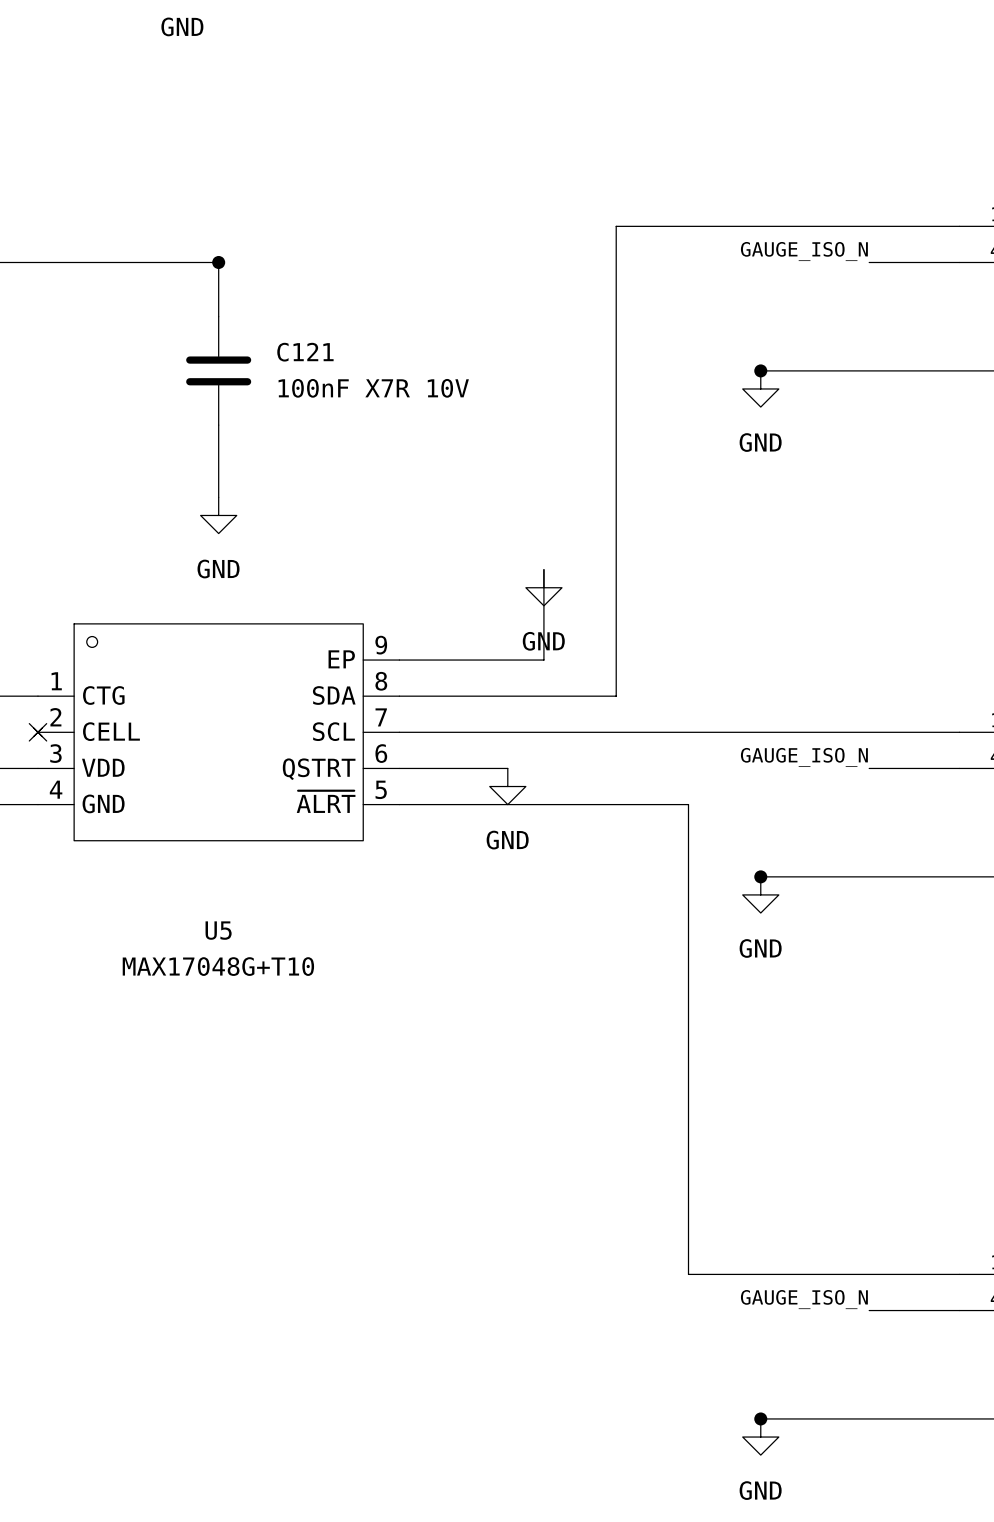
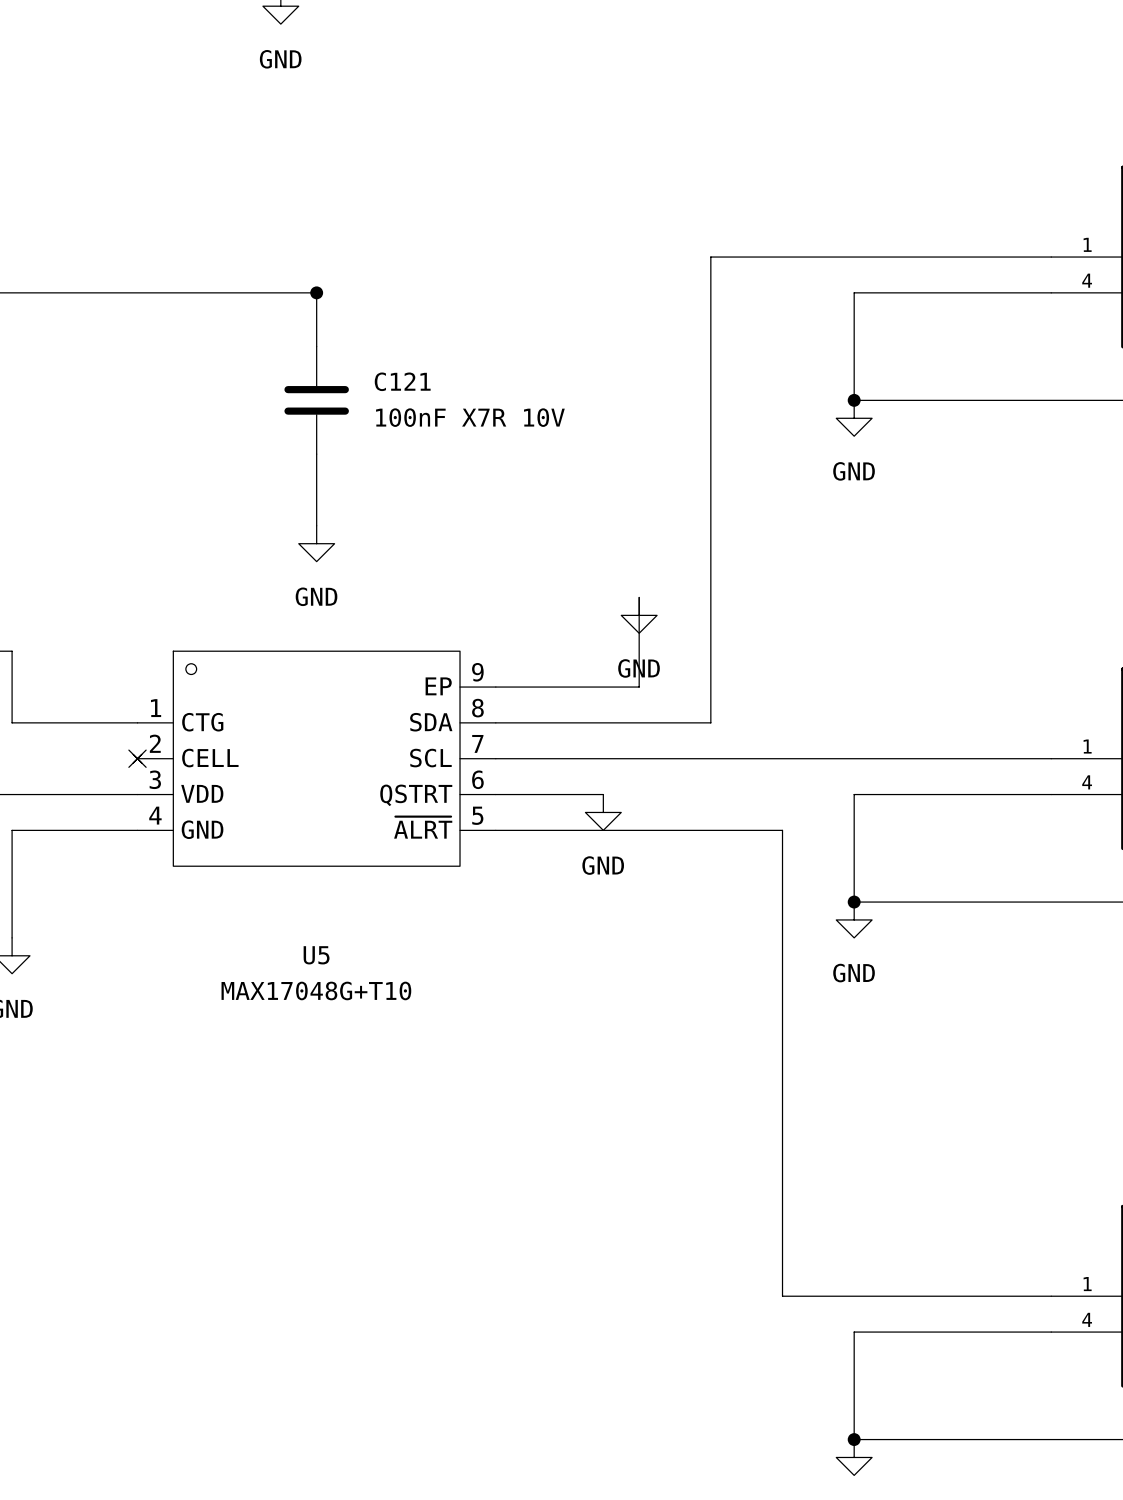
label: GAUGE_ISO_N (804, 251) -> none
wire: none -> (961, 292) (854, 292) (854, 400)
label: GAUGE_ISO_N (804, 757) -> none
wire: none -> (961, 794) (854, 794) (854, 902)
label: GAUGE_ISO_N (804, 1299) -> none
wire: none -> (961, 1332) (854, 1332) (854, 1439)

